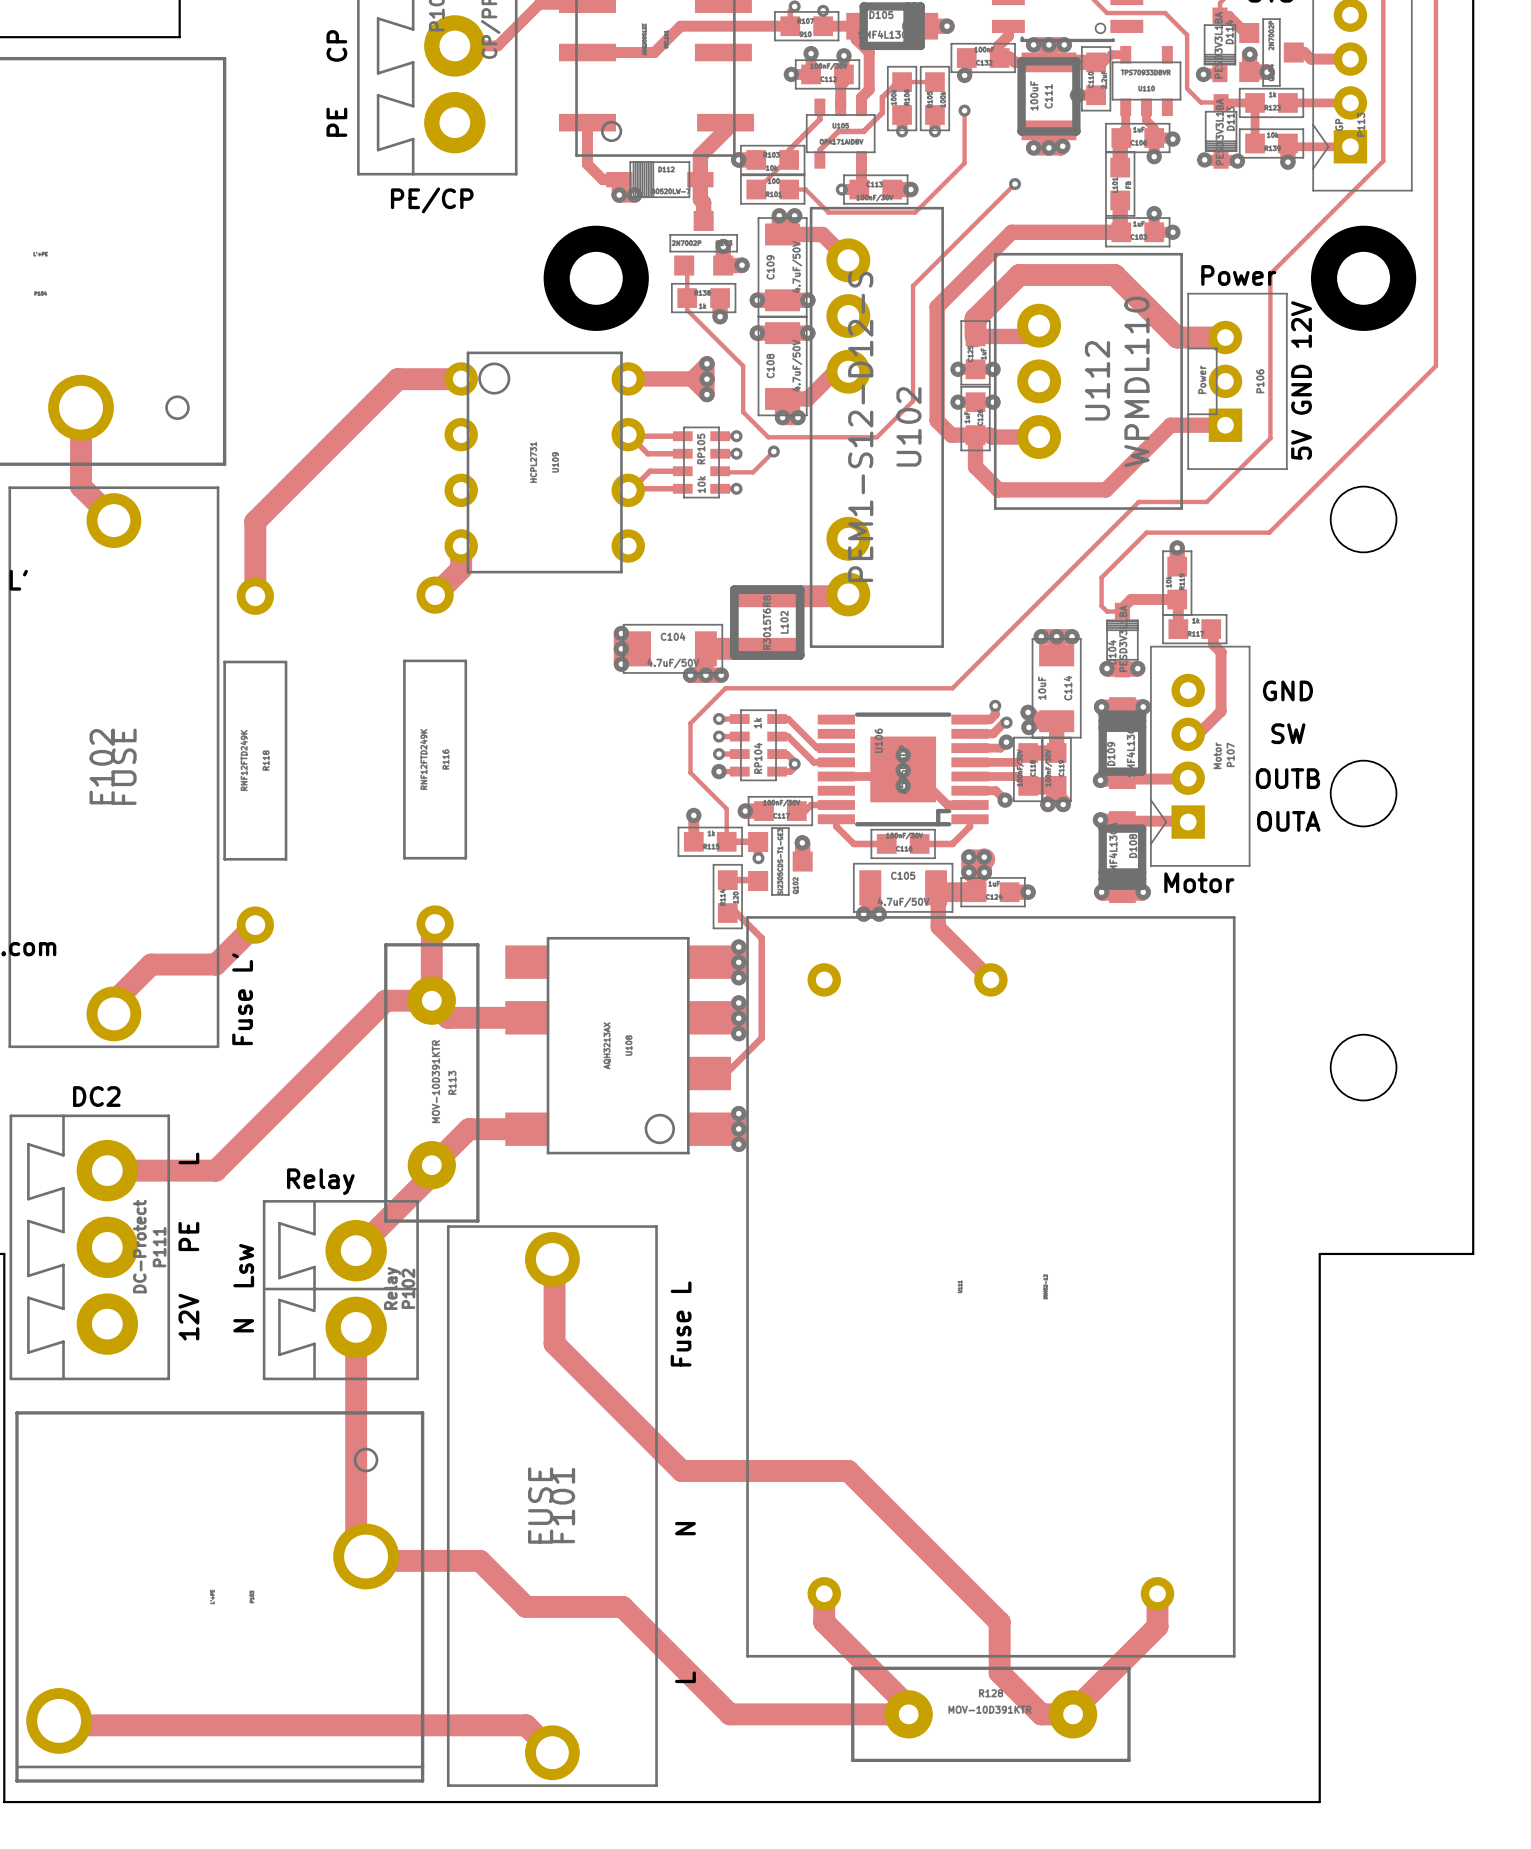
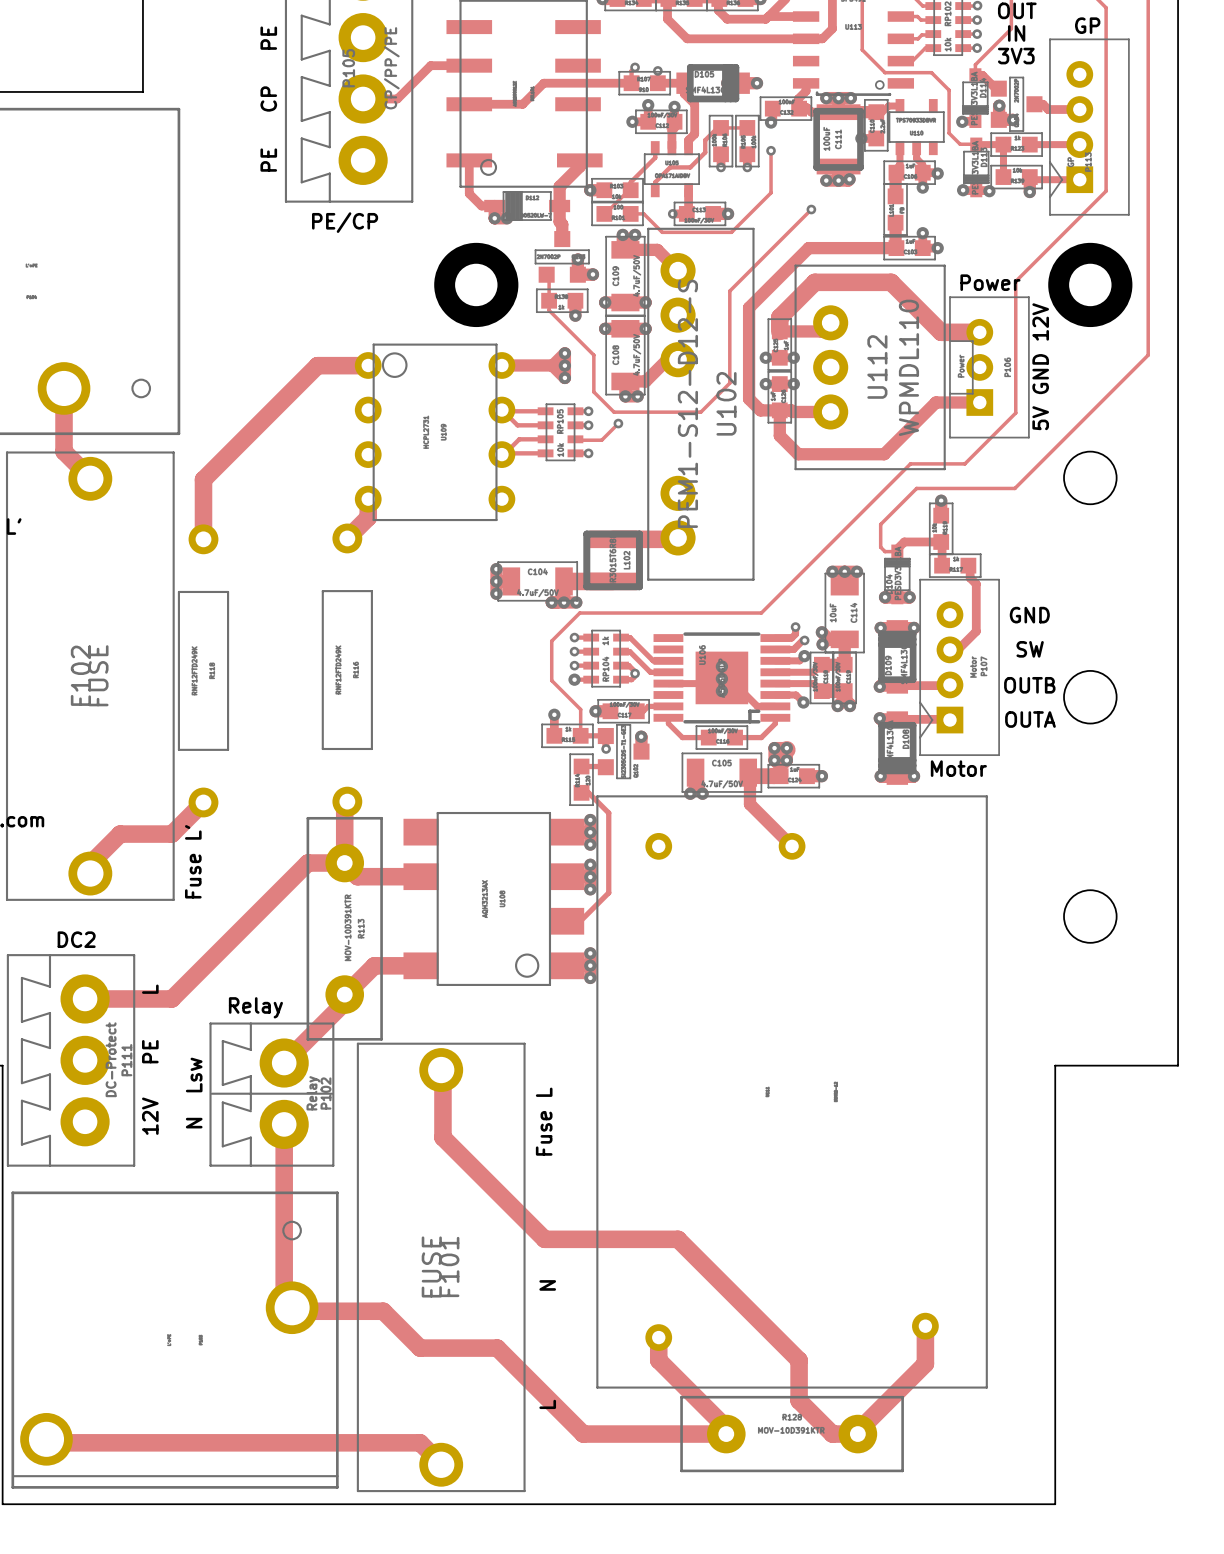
part footprint: [746, 916, 1236, 1658] -> [596, 795, 988, 1389]

